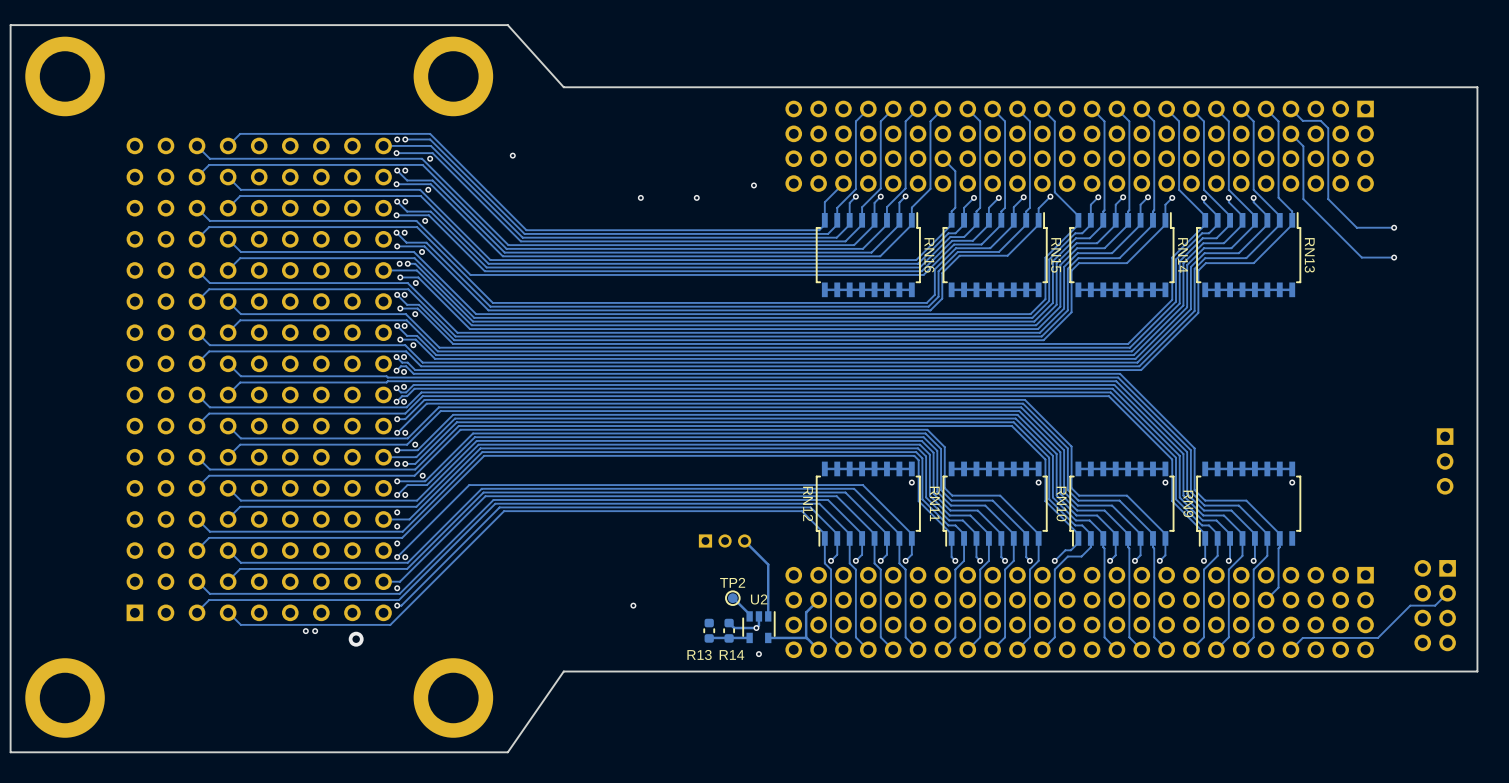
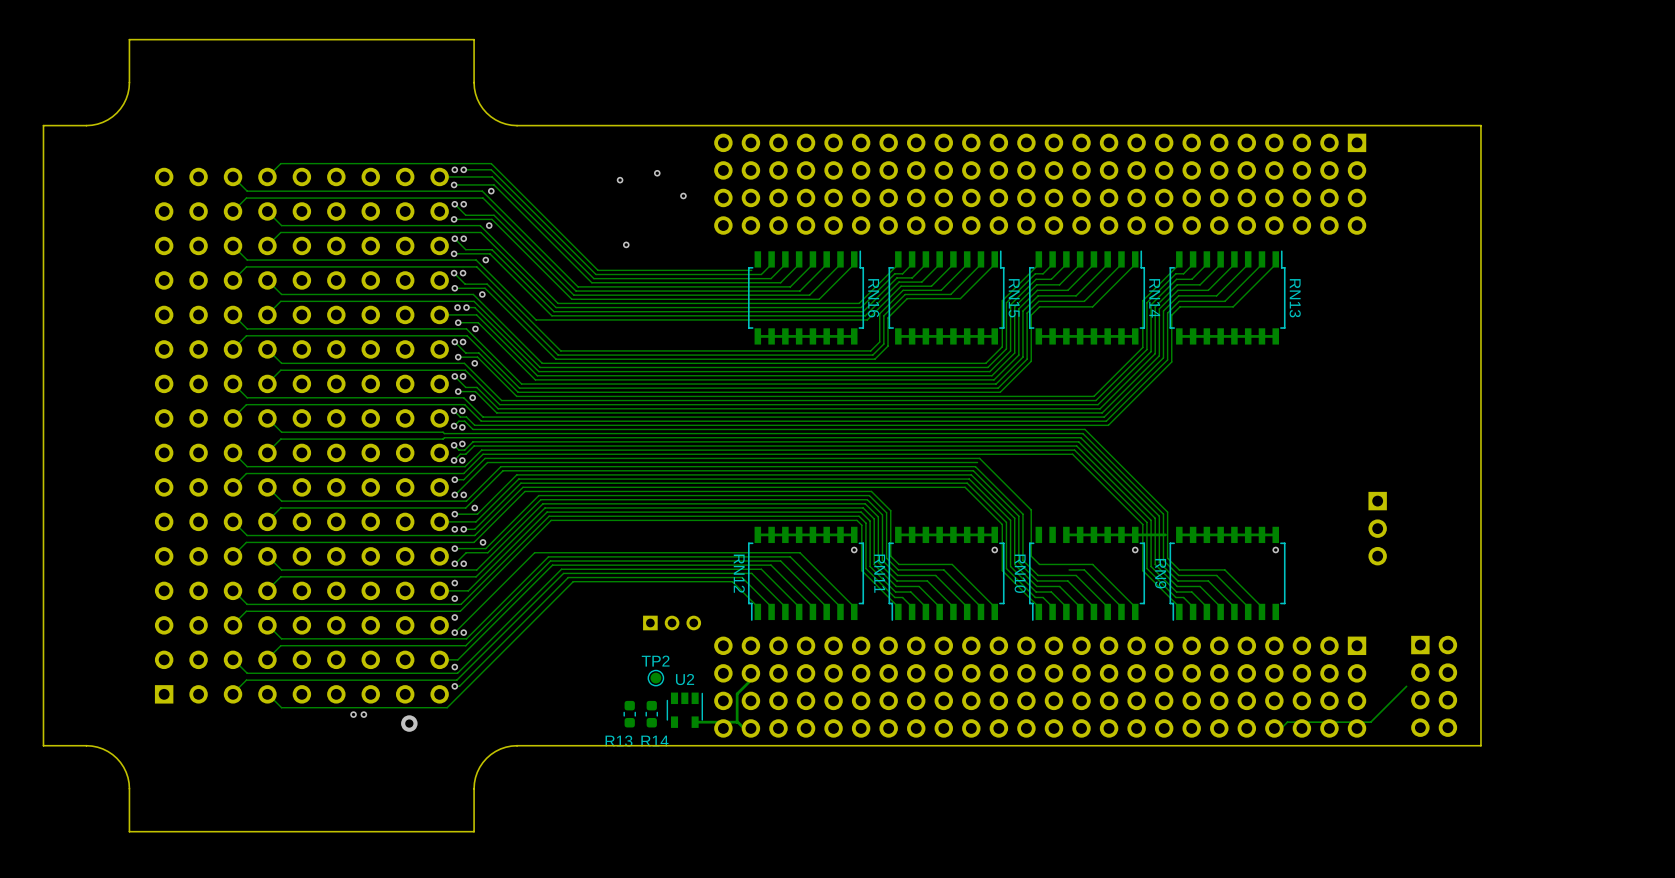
board edge: (507, 25) (563, 87) (1477, 87) (1477, 671) (563, 671) (507, 752) (10, 752) (10, 25) (507, 25) -> (474, 39) (474, 82) (477, 99) (490, 116) (511, 125) (1480, 125) (1480, 745) (517, 745) (495, 751) (479, 767) (474, 783) (474, 831) (129, 831) (129, 783) (123, 767) (116, 758) (107, 751) (92, 746) (43, 745) (43, 125) (92, 125) (102, 122) (116, 113) (123, 104) (129, 88) (129, 39) (474, 39)
part: (65, 76) -> none
part: (453, 76) -> none
track: (868, 109) (855, 121) (855, 189) (837, 207) (837, 224) (828, 233) (673, 233) -> (771, 264) (761, 274)
track: (893, 109) (880, 121) (880, 188) (862, 207) (862, 224) (845, 241) (691, 241) -> (799, 264) (780, 282)
track: (918, 109) (905, 121) (905, 188) (886, 207) (886, 224) (862, 248) (708, 248) -> (826, 264) (799, 291)
track: (942, 109) (930, 121) (930, 188) (911, 207) (911, 224) (880, 256) (726, 256) -> (854, 264) (819, 299)
track: (967, 109) (980, 121) (980, 207) (976, 211) (976, 224) (964, 237) (950, 237) (919, 267) (765, 267) -> (925, 264) (912, 277) (896, 277) (863, 311)
track: (992, 109) (1005, 121) (1005, 207) (1001, 211) (1001, 224) (981, 244) (954, 244) (923, 274) (769, 274) -> (953, 264) (931, 286) (901, 286) (867, 319)
track: (1017, 109) (1029, 121) (1029, 207) (1026, 211) (1026, 224) (998, 251) (957, 251) (938, 271) (938, 296) (928, 306) (774, 306) -> (980, 264) (950, 294) (905, 294) (883, 315) (883, 344) (872, 355)
track: (1042, 109) (1054, 121) (1054, 192) (1078, 215) (1078, 224) (1045, 257) (1045, 299) (1030, 314) (876, 314) -> (1038, 264) (1002, 300) (1002, 346) (985, 363)
track: (1092, 109) (1104, 121) (1103, 224) (1089, 238) (1075, 238) (1052, 261) (1052, 302) (1034, 321) (880, 321) -> (1066, 264) (1051, 279) (1036, 279) (1010, 304) (1010, 350) (989, 371)
track: (1116, 109) (1129, 121) (1128, 224) (1104, 248) (1077, 248) -> (1234, 264) (1208, 290)
track: (1141, 109) (1154, 121) (1152, 224) (1119, 258) (1092, 258) -> (1261, 264) (1224, 301)
track: (1166, 109) (1179, 121) (1179, 189) (1205, 215) (1205, 224) (1172, 257) -> none
track: (1191, 109) (1203, 121) (1203, 189) (1230, 215) (1230, 224) (1216, 238) (1202, 238) (1179, 261) (1179, 303) (1131, 351) (977, 351) -> (1206, 264) (1191, 279) (1176, 279) (1151, 304) (1151, 351) (1098, 404)
track: (1216, 109) (1228, 121) (1228, 189) (1254, 215) (1254, 224) (1231, 248) (1203, 248) (1187, 265) (1187, 307) (1135, 358) (981, 358) -> none
track: (1241, 109) (1253, 121) (1253, 189) (1279, 215) (1279, 224) (1246, 258) (1205, 258) (1194, 268) (1194, 311) (1139, 366) (985, 366) -> (1209, 301) (1179, 301) (1167, 313) (1167, 359) (1106, 421)
track: (1266, 109) (1278, 121) (1278, 197) (1292, 211) (1292, 224) (1253, 263) (1205, 263) (1198, 270) (1198, 312) (1141, 370) (987, 370) -> (1210, 306) (1180, 306) (1171, 315) (1171, 361) (1108, 425)
track: (1290, 109) (1302, 120) (1320, 120) (1328, 128) (1328, 199) (1356, 227) (1394, 227) -> none
track: (1290, 133) (1303, 146) (1303, 199) (1361, 257) (1394, 257) -> none
via: none -> (657, 173)
part position: (1079, 146) -> (1040, 184)
via: none -> (620, 180)
via: (512, 155) -> none
track: (942, 158) (955, 171) (955, 207) (951, 211) (951, 224) (916, 260) (762, 260) -> (898, 264) (859, 303)
via: none -> (683, 195)
track: (843, 183) (824, 202) (824, 224) (819, 230) (665, 230) -> none
via: (753, 185) -> none
track: (855, 196) (849, 202) (849, 224) (836, 237) (682, 237) -> (785, 264) (771, 278)
via: (855, 196) -> none
track: (880, 196) (874, 202) (874, 224) (854, 245) (700, 245) -> (812, 264) (790, 286)
via: (880, 196) -> none
track: (905, 196) (899, 202) (899, 224) (871, 252) (717, 252) -> (840, 264) (809, 295)
via: (905, 196) -> none
track: (1050, 196) (1038, 208) (1038, 224) (1007, 255) (959, 255) (942, 273) (942, 298) (930, 310) (776, 310) -> (994, 264) (960, 298) (907, 298) (887, 317) (887, 346) (874, 359)
via: (1050, 196) -> none
via: (640, 197) -> none
via: (696, 197) -> none
track: (973, 197) (964, 207) (964, 224) (955, 233) (948, 233) (918, 263) (763, 263) -> (912, 264) (902, 273) (894, 273) (861, 307)
via: (973, 197) -> none
track: (998, 197) (988, 207) (988, 224) (972, 240) (952, 240) (921, 271) (767, 271) -> (939, 264) (921, 282) (899, 282) (865, 315)
via: (998, 197) -> none
track: (1023, 197) (1013, 207) (1013, 224) (990, 248) (955, 248) (934, 269) (934, 294) (926, 302) (772, 302) -> (967, 264) (941, 290) (903, 290) (879, 313) (879, 342) (870, 350)
via: (1023, 197) -> none
track: (1098, 197) (1090, 204) (1090, 224) (1082, 233) (1075, 233) (1049, 259) (1049, 301) (1032, 317) (878, 317) -> (1052, 264) (1043, 273) (1035, 273) (1006, 302) (1006, 348) (987, 367)
via: (1098, 197) -> none
track: (1123, 197) (1115, 204) (1115, 224) (1097, 243) (1076, 243) (1056, 263) (1056, 304) (1036, 325) (882, 325) -> (1080, 264) (1059, 284) (1036, 284) (1014, 306) (1014, 353) (991, 375)
via: (1123, 197) -> none
track: (1148, 197) (1140, 204) (1140, 224) (1112, 253) (1084, 253) -> (1248, 264) (1216, 295)
via: (1148, 197) -> none
track: (1172, 197) (1165, 204) (1165, 224) (1127, 263) (1099, 263) -> (1275, 264) (1233, 306)
via: (1172, 197) -> none
track: (1203, 197) (1203, 202) (1217, 215) (1217, 224) (1209, 233) (1202, 233) (1175, 259) (1175, 301) (1129, 347) (975, 347) -> (1193, 264) (1183, 273) (1175, 273) (1146, 302) (1146, 349) (1095, 400)
via: (1203, 197) -> none
track: (1228, 197) (1228, 202) (1242, 215) (1242, 224) (1223, 243) (1203, 243) (1183, 263) (1183, 305) (1133, 355) (979, 355) -> (1220, 264) (1200, 284) (1177, 284) (1155, 306) (1155, 353) (1100, 408)
via: (1228, 197) -> none
track: (1253, 197) (1253, 202) (1267, 215) (1267, 224) (1238, 253) (1204, 253) (1190, 266) (1190, 309) (1137, 362) (983, 362) -> (1208, 295) (1178, 295) (1163, 311) (1163, 357) (1104, 417)
via: (1253, 197) -> none
via: none -> (626, 244)
track: none -> (1093, 264) (1067, 290) (1037, 290) (1018, 308) (1018, 355) (994, 379)
track: none -> (1179, 264) (1142, 300)
via: (1394, 227) -> none
track: (1077, 248) (1060, 265) (1060, 306) (1038, 329) (883, 329) -> (1208, 290) (1177, 290) (1159, 308) (1159, 355) (1102, 412)
track: (1077, 253) (1064, 266) (1064, 308) (1039, 332) (885, 332) -> (1107, 264) (1076, 295) (1038, 295) (1022, 311) (1022, 357) (996, 384)
RN16 position: (868, 254) -> (806, 297)
RN15 position: (995, 254) -> (946, 297)
RN14 position: (1121, 254) -> (1087, 297)
RN13 position: (1248, 254) -> (1227, 297)
track: (1172, 257) (1172, 299) (1128, 343) (973, 343) -> (1142, 300) (1142, 347) (1093, 396)
via: (1394, 257) -> none
track: (1078, 258) (1067, 268) (1067, 310) (1041, 336) (887, 336) -> (1121, 264) (1084, 301) (1038, 301) (1027, 313) (1027, 359) (998, 388)
track: (1079, 263) (1071, 270) (1071, 312) (1043, 340) (889, 340) -> (1135, 264) (1092, 306) (1039, 306) (1031, 315) (1031, 361) (1000, 392)
track: none -> (854, 336) (757, 336)
track: (911, 289) (884, 289) -> (928, 336) (898, 336)
track: (1038, 289) (1011, 289) -> (1069, 336) (1038, 336)
track: (1165, 289) (1138, 289) -> (1209, 336) (1179, 336)
track: (1292, 289) (1205, 289) -> none
track: (965, 373) (1120, 373) (1194, 448) (1194, 490) (1205, 500) (1246, 500) (1279, 534) (1278, 587) (1266, 600) -> none
track: (964, 377) (1118, 377) (1190, 450) (1190, 491) (1204, 505) (1238, 505) (1267, 534) (1267, 555) (1253, 569) (1253, 637) (1241, 649) -> none
track: (962, 381) (1116, 381) (1187, 452) (1187, 493) (1203, 510) (1231, 510) (1254, 534) (1253, 560) -> none
track: (960, 384) (1114, 384) (1183, 453) (1183, 495) (1203, 515) (1223, 515) (1242, 534) (1242, 555) (1228, 569) (1228, 637) (1216, 649) -> (1078, 441) (1155, 518) (1155, 564) (1177, 586) (1200, 586) (1220, 607)
track: (958, 388) (1112, 388) (1179, 455) (1179, 497) (1202, 520) (1216, 520) (1230, 534) (1228, 560) -> (1076, 445) (1151, 520) (1151, 566) (1176, 592) (1191, 592) (1206, 607)
track: (956, 392) (1110, 392) (1175, 457) (1175, 499) (1202, 525) (1209, 525) (1217, 534) (1217, 555) (1203, 569) (1203, 637) (1191, 649) -> (1074, 450) (1146, 522) (1146, 568) (1175, 597) (1183, 597) (1193, 607)
track: (954, 396) (1108, 396) (1172, 459) (1172, 501) -> (1072, 454) (1142, 524) (1142, 570)
track: (870, 399) (1024, 399) (1071, 446) (1071, 488) (1079, 495) (1127, 495) (1165, 534) (1165, 555) (1159, 560) -> (979, 458) (1031, 510) (1031, 556) (1039, 564) (1069, 564)
track: (868, 403) (1023, 403) (1067, 448) (1067, 490) (1078, 500) -> (1084, 429) (1167, 512) (1167, 558) (1179, 569) (1209, 569)
track: (867, 407) (1021, 407) (1064, 450) (1064, 491) (1077, 505) -> (1082, 433) (1163, 514) (1163, 560) (1178, 575) (1208, 575)
track: none -> (975, 466) (1022, 514) (1022, 560) (1038, 575) (1068, 575)
track: (865, 411) (1019, 411) (1060, 452) (1060, 493) (1077, 510) -> (1080, 437) (1159, 516) (1159, 562) (1177, 580) (1208, 580)
track: (863, 414) (1017, 414) (1056, 453) (1056, 495) (1076, 515) (1097, 515) (1115, 534) (1115, 555) (1110, 560) -> (971, 474) (1014, 518) (1014, 564) (1036, 586) (1059, 586) (1080, 607)
track: (861, 418) (1015, 418) (1052, 455) (1052, 497) (1075, 520) (1089, 520) (1103, 534) (1104, 637) (1116, 649) -> (969, 479) (1010, 520) (1010, 566) (1036, 592) (1051, 592) (1066, 607)
track: (859, 422) (1013, 422) (1049, 457) (1049, 499) (1075, 525) (1082, 525) (1090, 534) (1090, 547) (1081, 556) (1067, 556) (1054, 569) (1054, 637) (1042, 649) -> (967, 483) (1006, 522) (1006, 568) (1035, 597) (1043, 597) (1052, 607)
track: (857, 426) (1011, 426) (1045, 459) (1045, 501) -> (965, 487) (1002, 524) (1002, 570)
track: (773, 429) (927, 429) (944, 447) (944, 488) (952, 495) -> (871, 491) (890, 510) (890, 556) (899, 564) (952, 564) (994, 607)
track: (771, 433) (925, 433) (941, 449) (941, 490) (951, 500) -> (869, 495) (886, 512) (886, 558) (898, 569) (943, 569) (980, 607)
track: (769, 437) (923, 437) (937, 450) (937, 491) (950, 505) -> (867, 499) (882, 514) (882, 560) (897, 575) (935, 575) (967, 607)
track: (767, 440) (921, 440) (933, 452) (933, 493) (950, 510) -> (973, 470) (1018, 516) (1018, 562) (1037, 580) (1067, 580)
track: none -> (865, 503) (878, 516) (878, 562) (896, 580) (927, 580) (953, 607)
track: (765, 444) (919, 444) (929, 454) (929, 495) (949, 515) (970, 515) (988, 534) (988, 560) (980, 569) (980, 637) (967, 649) -> (863, 507) (874, 519) (874, 564) (896, 586) (919, 586) (939, 607)
track: (763, 448) (918, 448) (926, 456) (926, 497) (949, 520) (962, 520) (976, 534) (976, 557) (980, 560) -> (861, 512) (870, 521) (870, 566) (895, 592) (910, 592) (925, 607)
track: (762, 452) (916, 452) (922, 458) (922, 499) (948, 525) (955, 525) (964, 534) (964, 560) (955, 569) (955, 637) (942, 649) -> (859, 516) (865, 523) (865, 568) (894, 597) (902, 597) (912, 607)
track: (760, 455) (914, 455) (918, 460) (918, 501) -> (857, 520) (861, 525) (861, 570)
part position: (1445, 461) -> (1377, 528)
track: none -> (854, 534) (757, 534)
track: (911, 468) (884, 468) -> (928, 534) (898, 534)
track: (1165, 468) (1138, 468) -> (1209, 534) (1179, 534)
track: (1292, 468) (1205, 468) -> none
via: none -> (854, 549)
via position: (911, 482) -> (994, 549)
via position: (1038, 482) -> (1135, 549)
via position: (1165, 482) -> (1275, 549)
via: (1292, 482) -> none
track: (708, 485) (862, 485) (911, 534) (911, 554) (905, 560) -> (799, 552) (854, 607)
track: (700, 488) (854, 488) (899, 534) (899, 563) (905, 569) (905, 637) (918, 649) -> (790, 556) (840, 607)
track: (691, 492) (845, 492) (886, 534) (886, 554) (880, 560) -> (780, 561) (826, 607)
track: (972, 495) (1000, 495) (1038, 534) (1038, 560) (1029, 569) (1029, 637) (1017, 649) -> (1092, 564) (1135, 607)
track: (682, 496) (836, 496) (874, 534) (874, 563) (880, 569) (880, 637) (893, 649) -> (771, 565) (812, 607)
track: (673, 499) (828, 499) (862, 534) (862, 554) (855, 560) -> (761, 569) (799, 607)
track: (965, 500) (992, 500) (1026, 534) (1026, 557) (1029, 560) -> (1084, 569) (1121, 607)
track: (1092, 500) (1119, 500) (1152, 534) (1154, 637) (1166, 649) -> (1224, 569) (1261, 607)
track: none -> (861, 570) (898, 607)
track: none -> (1002, 570) (1038, 607)
track: (918, 501) (951, 534) (951, 557) (955, 560) -> none
track: none -> (1142, 570) (1179, 607)
track: (1045, 501) (1078, 534) (1078, 542) (1070, 550) (1065, 550) (1054, 560) -> none
track: (1172, 501) (1205, 534) (1203, 560) -> none
track: (665, 503) (819, 503) (849, 534) (849, 563) (855, 569) (855, 637) (868, 649) -> (751, 573) (785, 607)
RN12 position: (868, 504) -> (806, 573)
RN11 position: (995, 504) -> (946, 573)
RN10 position: (1121, 504) -> (1087, 573)
RN9 position: (1248, 504) -> (1227, 573)
track: (957, 505) (985, 505) (1013, 534) (1013, 560) (1005, 569) (1005, 637) (992, 649) -> (1076, 575) (1107, 607)
track: (1084, 505) (1112, 505) (1140, 534) (1140, 555) (1134, 560) -> (1216, 575) (1248, 607)
track: (656, 507) (810, 507) (837, 534) (837, 554) (831, 560) -> (742, 577) (771, 607)
track: (950, 510) (977, 510) (1001, 534) (1001, 557) (1005, 560) -> (1067, 580) (1093, 607)
track: (1077, 510) (1104, 510) (1128, 534) (1129, 637) (1141, 649) -> (1208, 580) (1234, 607)
track: (647, 511) (801, 511) (824, 534) (824, 563) (831, 569) (831, 637) (843, 649) -> (732, 581) (757, 607)
part position: (725, 540) -> (672, 622)
track: (744, 540) (768, 564) (768, 616) -> none
via: (831, 560) -> none
via: (855, 560) -> none
via: (880, 560) -> none
via: (905, 560) -> none
via: (955, 560) -> none
via: (980, 560) -> none
via: (1005, 560) -> none
via: (1029, 560) -> none
via: (1054, 560) -> none
via: (1110, 560) -> none
via: (1134, 560) -> none
via: (1159, 560) -> none
via: (1203, 560) -> none
via: (1228, 560) -> none
via: (1253, 560) -> none
track: (1447, 593) (1435, 605) (1410, 605) (1377, 637) (1302, 637) (1290, 649) -> none
track: (732, 598) (749, 616) -> none
TP2 position: (732, 598) -> (655, 678)
track: (818, 600) (806, 612) (806, 637) -> (750, 680) (737, 693) (737, 722)
via: (633, 605) -> none
track: none -> (1406, 686) (1370, 722) (1287, 722) (1274, 735)
part: none -> (1434, 686)
part: (1435, 605) -> none
part position: (1079, 612) -> (1040, 687)
track: (758, 616) (758, 625) (756, 628) (734, 628) (729, 623) -> none
U2 position: (758, 627) -> (684, 710)
via: (756, 628) -> none
R13 position: (709, 630) -> (629, 714)
R14 position: (729, 630) -> (651, 714)
track: (749, 637) (709, 638) -> none
track: (768, 637) (806, 637) (818, 649) -> (695, 722) (737, 722) (750, 735)
via: (758, 654) -> none
part: (65, 697) -> none
part: (453, 697) -> none

